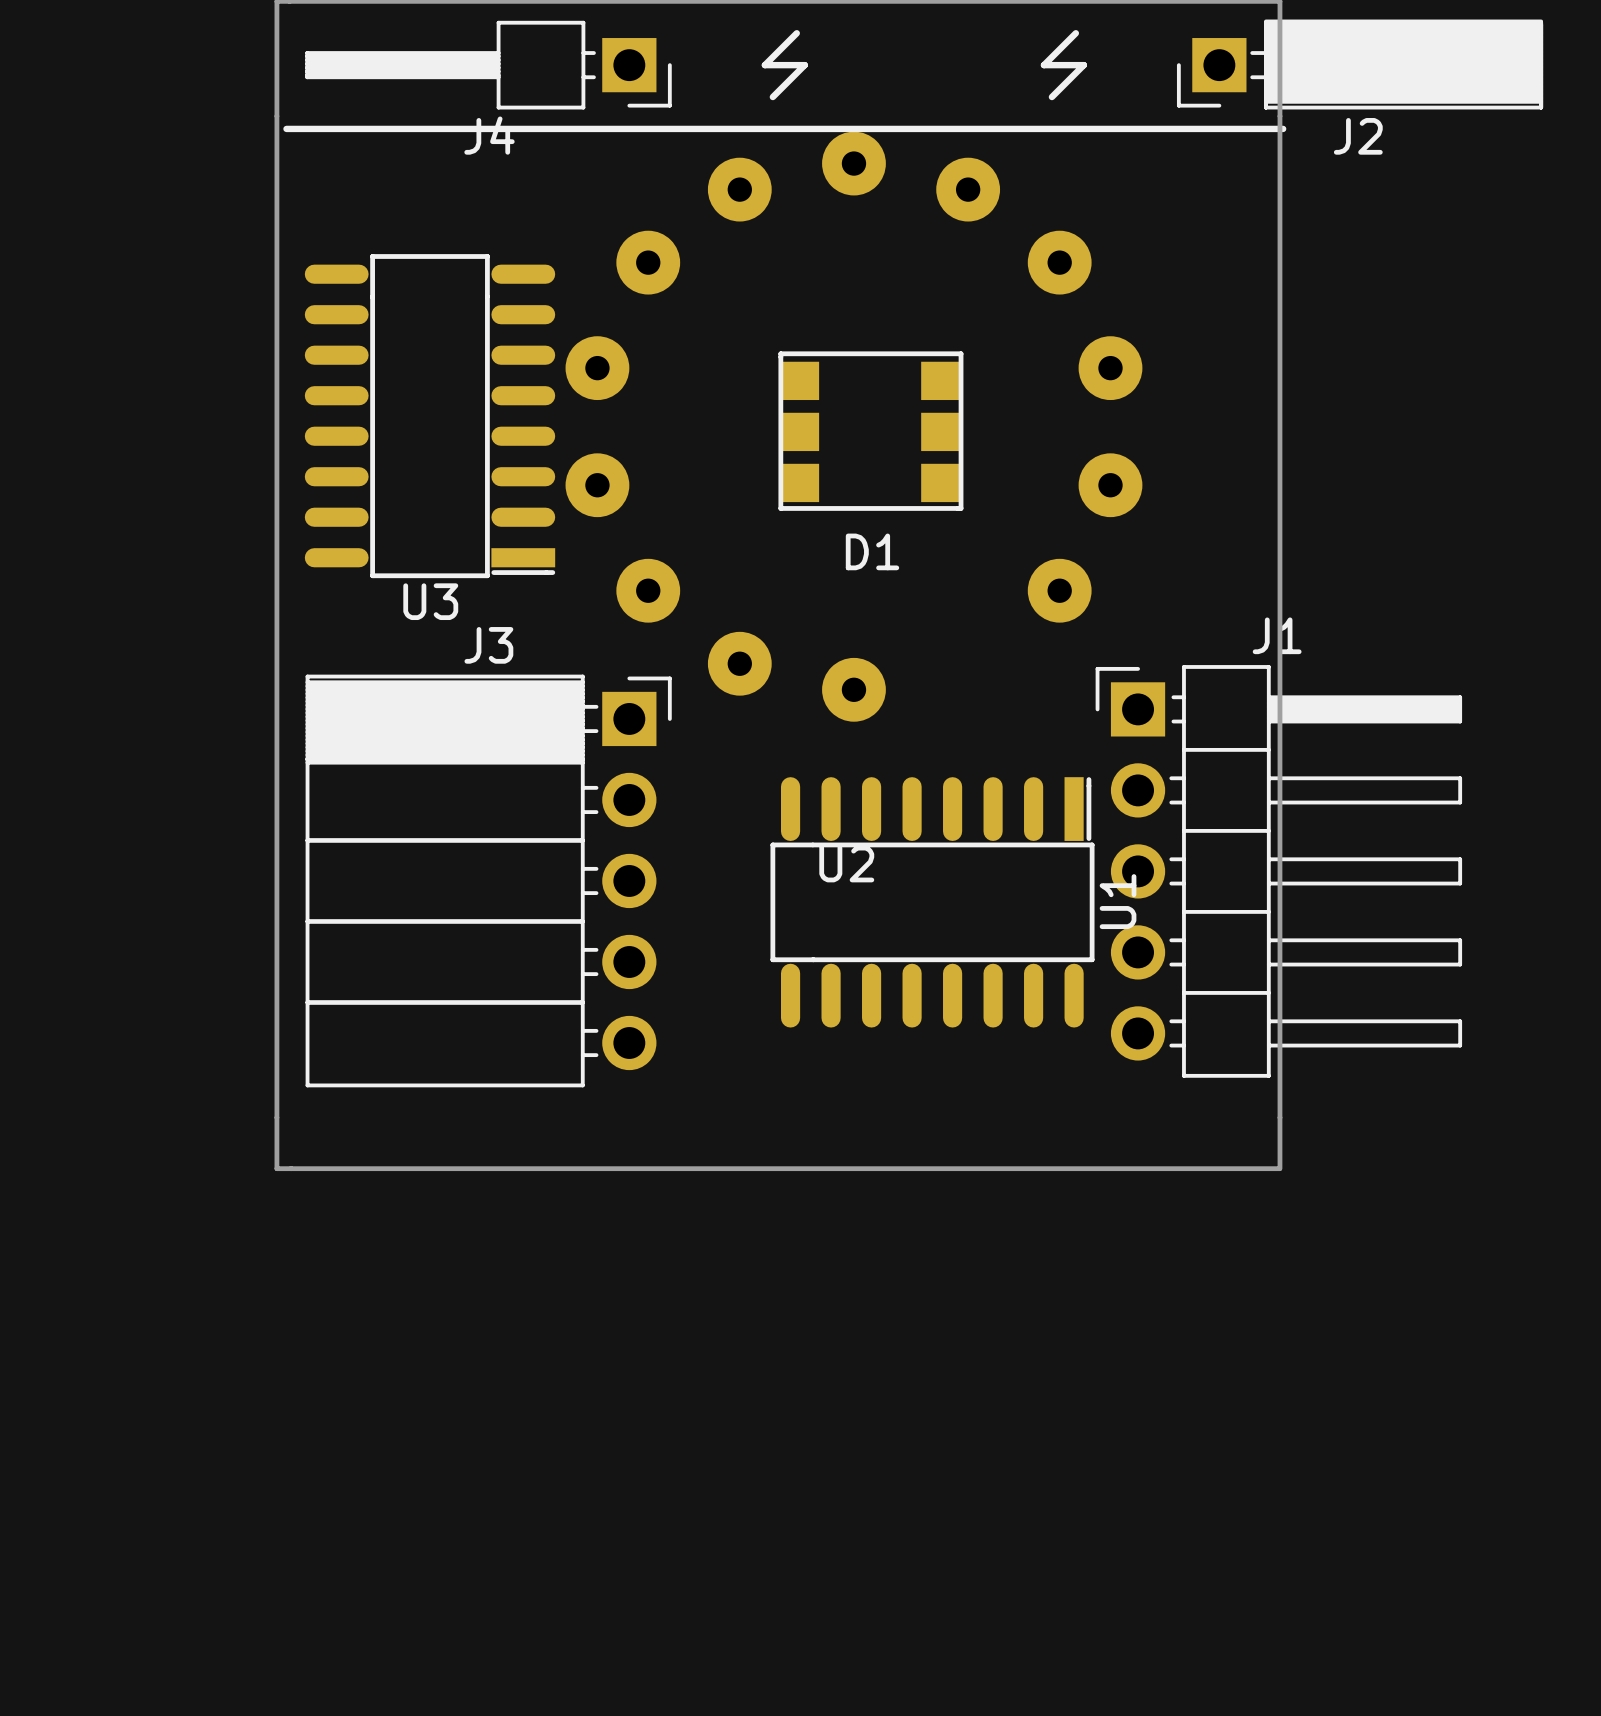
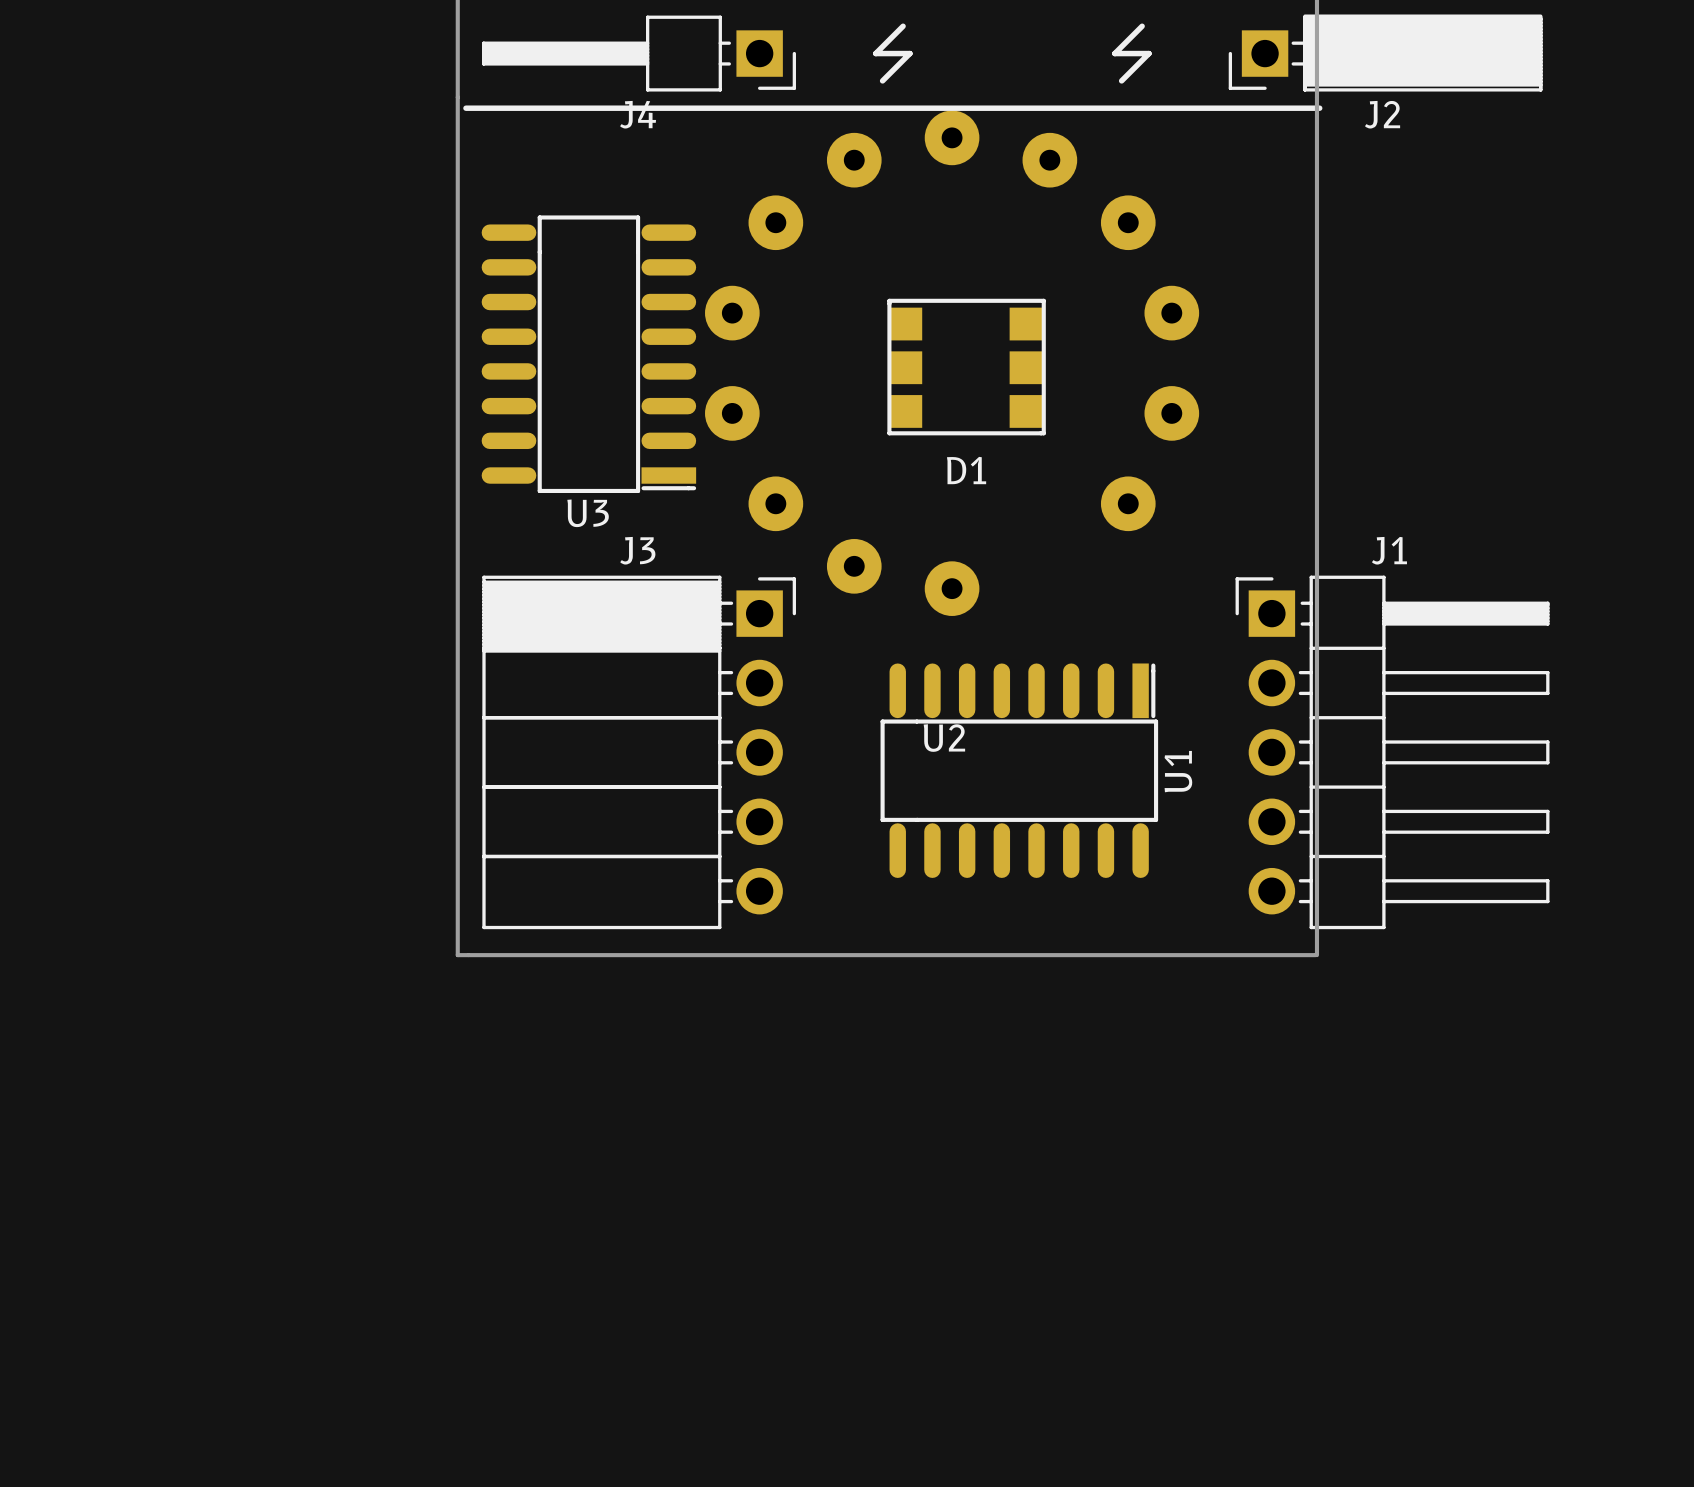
J1 position: (1278, 871) -> (1392, 752)
board edge: (276, 1117) (276, 1168) (1279, 1168) -> (457, 955) (1315, 955)
board edge: (1279, 1117) (1279, 1168) -> none

